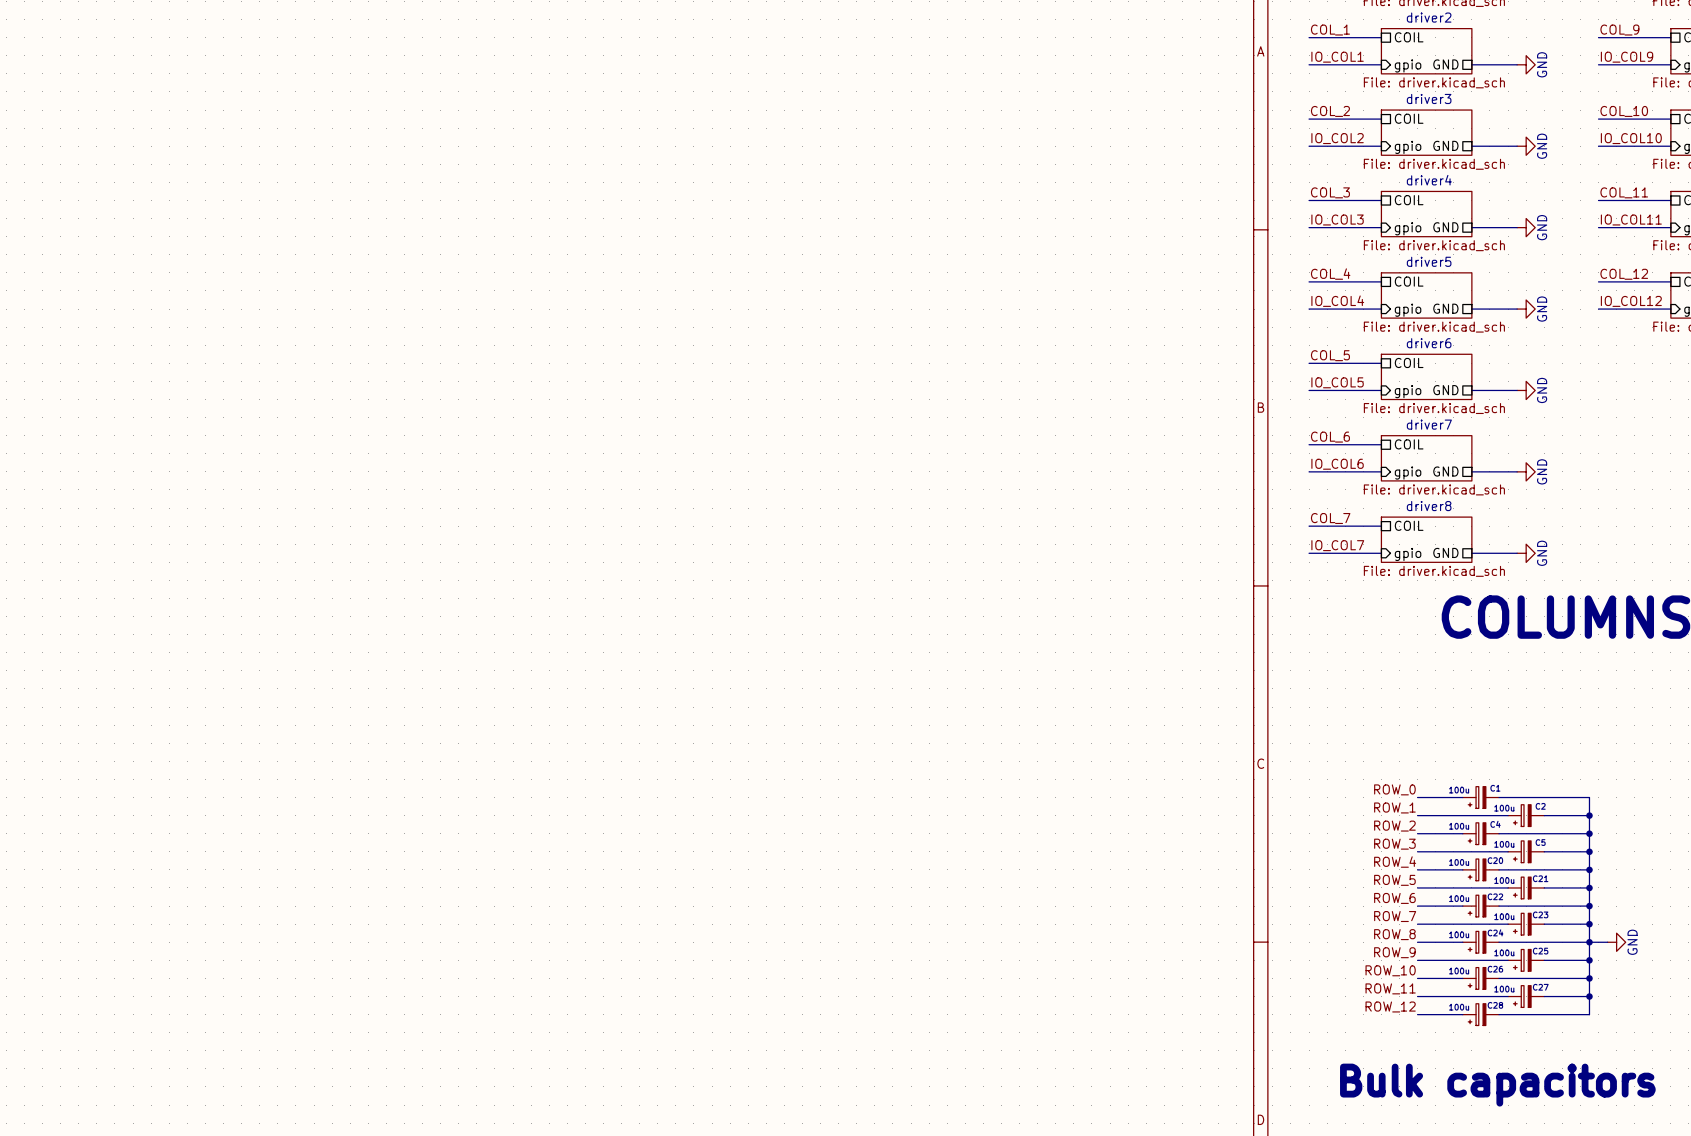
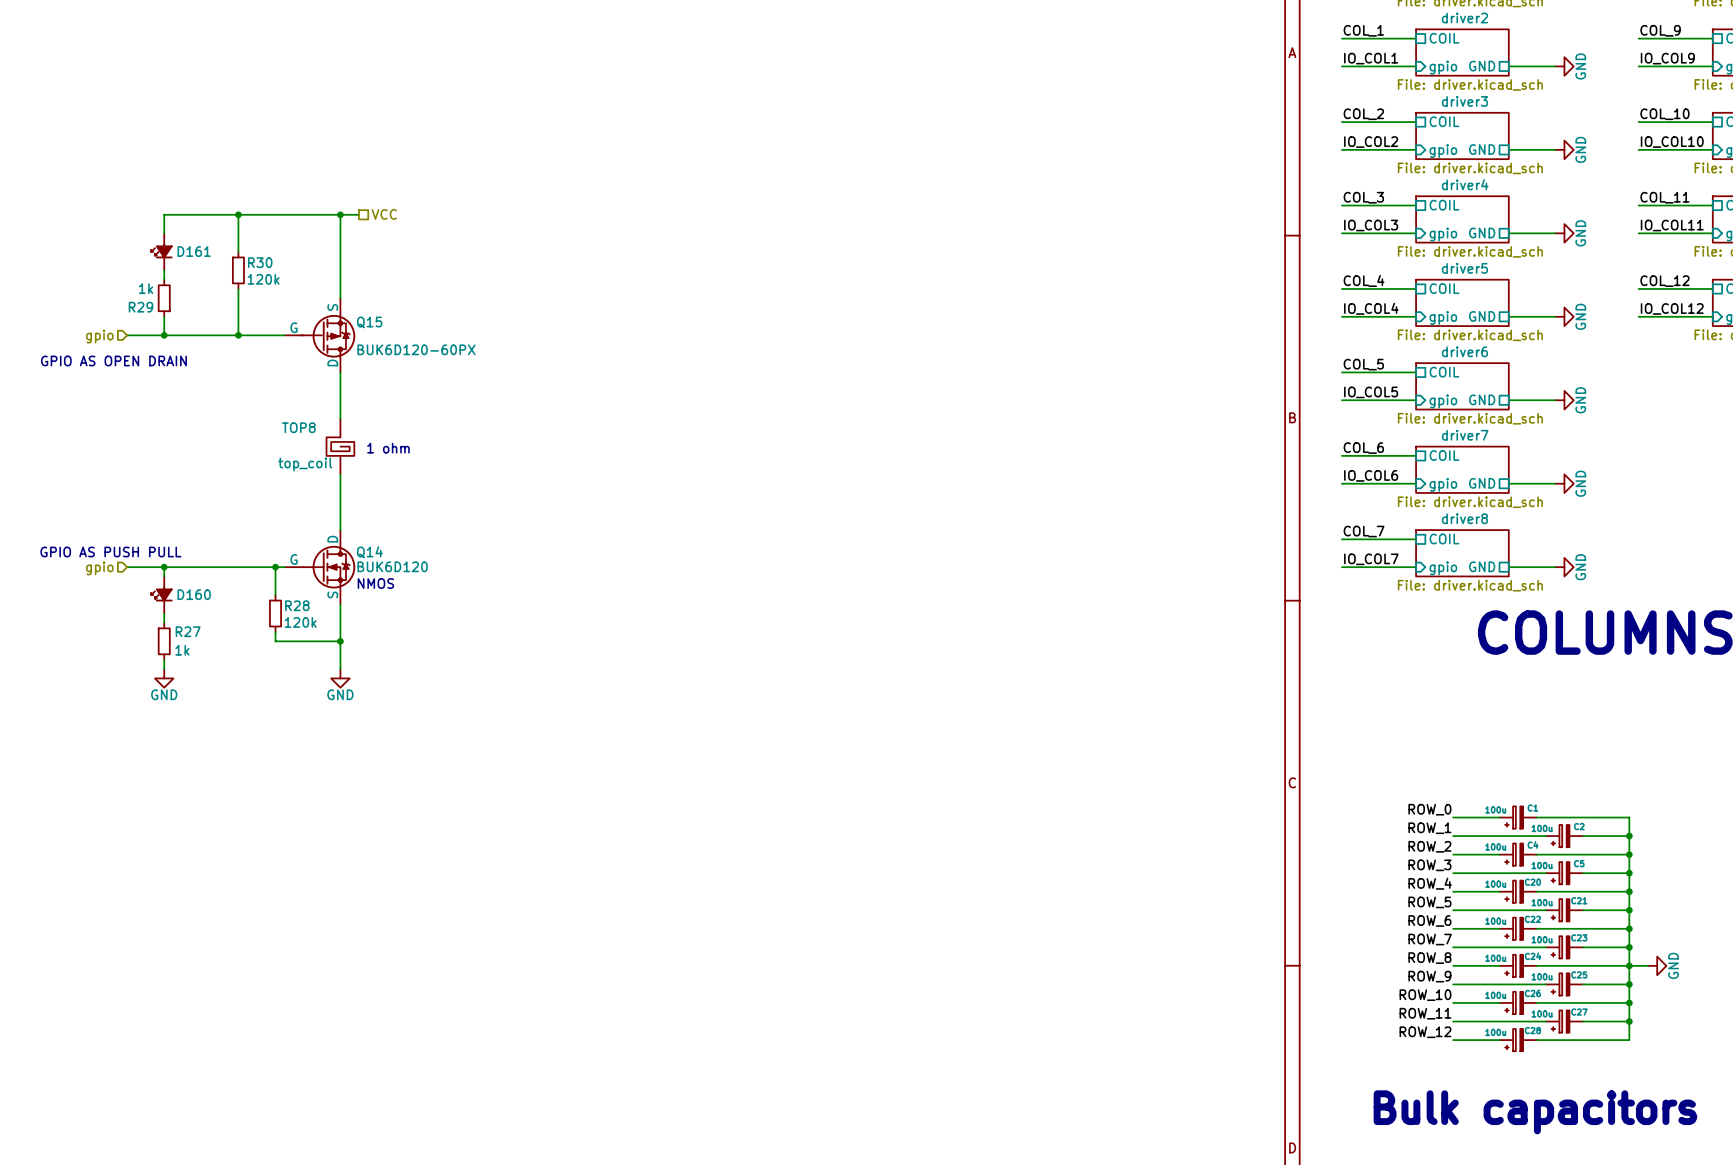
wire: none -> (238, 214) (238, 251)
junction: none -> (238, 214)
wire: none -> (340, 214) (340, 298)
junction: none -> (340, 214)
wire: none -> (358, 214) (164, 214) (164, 233)
hierarchical label: none -> VCC (384, 214)
D161: none -> (161, 251)
wire: none -> (164, 270) (164, 279)
R30: none -> 120k (238, 270)
wire: none -> (238, 288) (238, 335)
R29: none -> 1k (164, 298)
wire: none -> (164, 316) (164, 335)
wire: none -> (127, 335) (284, 335)
junction: none -> (164, 335)
junction: none -> (238, 335)
Q15: none -> BUK6D120-60PX (320, 335)
hierarchical label: none -> gpio (99, 336)
text: none -> GPIO AS OPEN DRAIN (113, 360)
wire: none -> (340, 372) (340, 418)
TOP8: none -> top_coil (340, 446)
text: none -> 1 ohm (388, 448)
wire: none -> (340, 474) (340, 530)
text: none -> GPIO AS PUSH PULL (110, 552)
wire: none -> (127, 567) (284, 567)
wire: none -> (164, 567) (164, 576)
junction: none -> (164, 567)
wire: none -> (275, 567) (275, 594)
junction: none -> (275, 567)
Q14: none -> BUK6D120 (320, 567)
hierarchical label: none -> gpio (99, 568)
text: none -> NMOS (375, 583)
D160: none -> (161, 594)
wire: none -> (340, 604) (340, 669)
wire: none -> (164, 613) (164, 622)
R28: none -> 120k (275, 613)
wire: none -> (275, 632) (275, 641) (340, 641)
R27: none -> 1k (164, 641)
junction: none -> (340, 641)
wire: none -> (164, 659) (164, 669)
power symbol: none -> GND (164, 678)
power symbol: none -> GND (340, 678)

